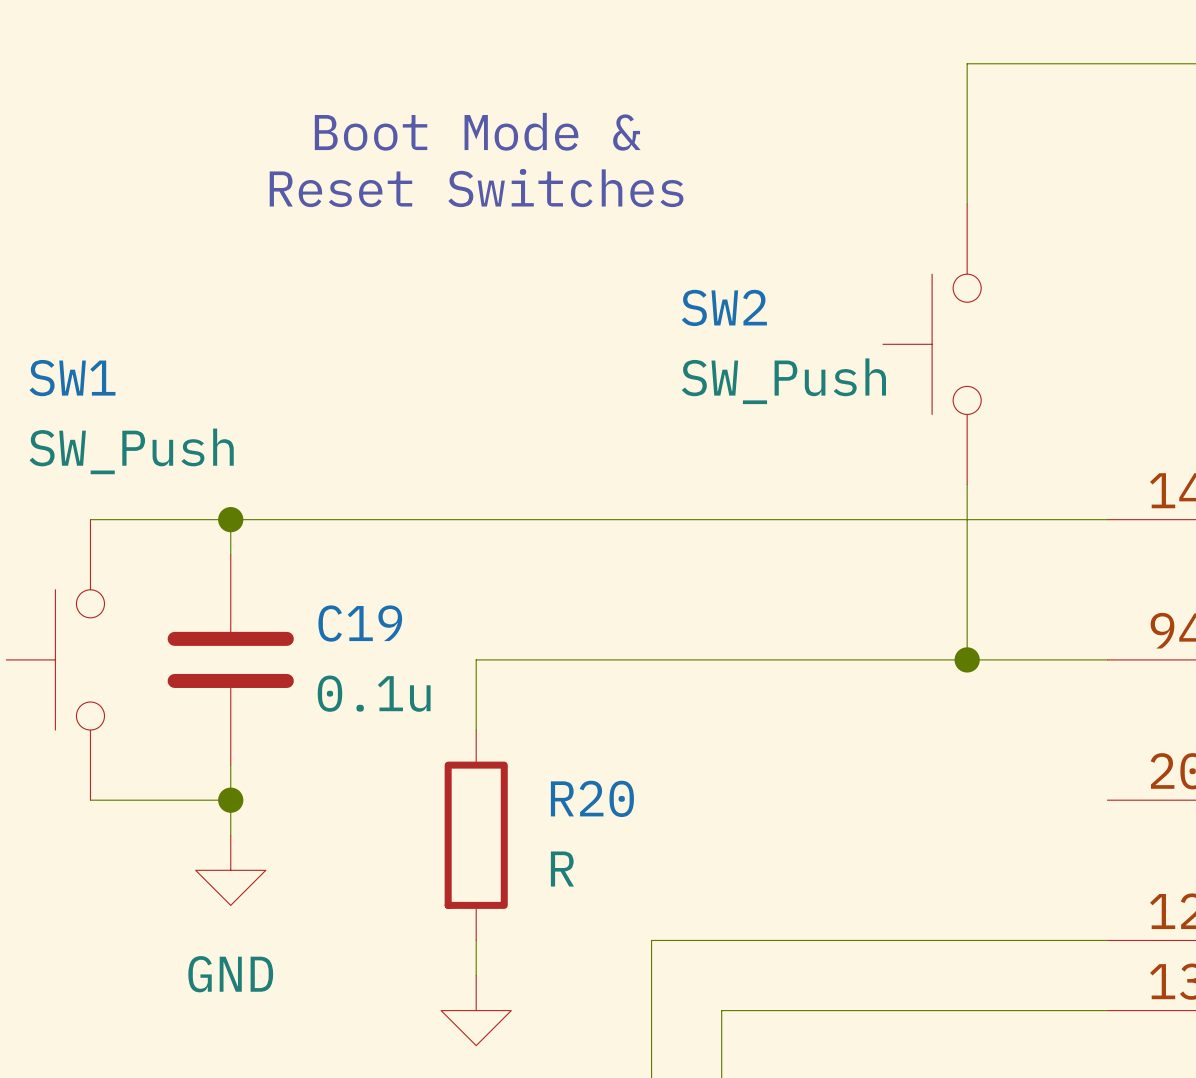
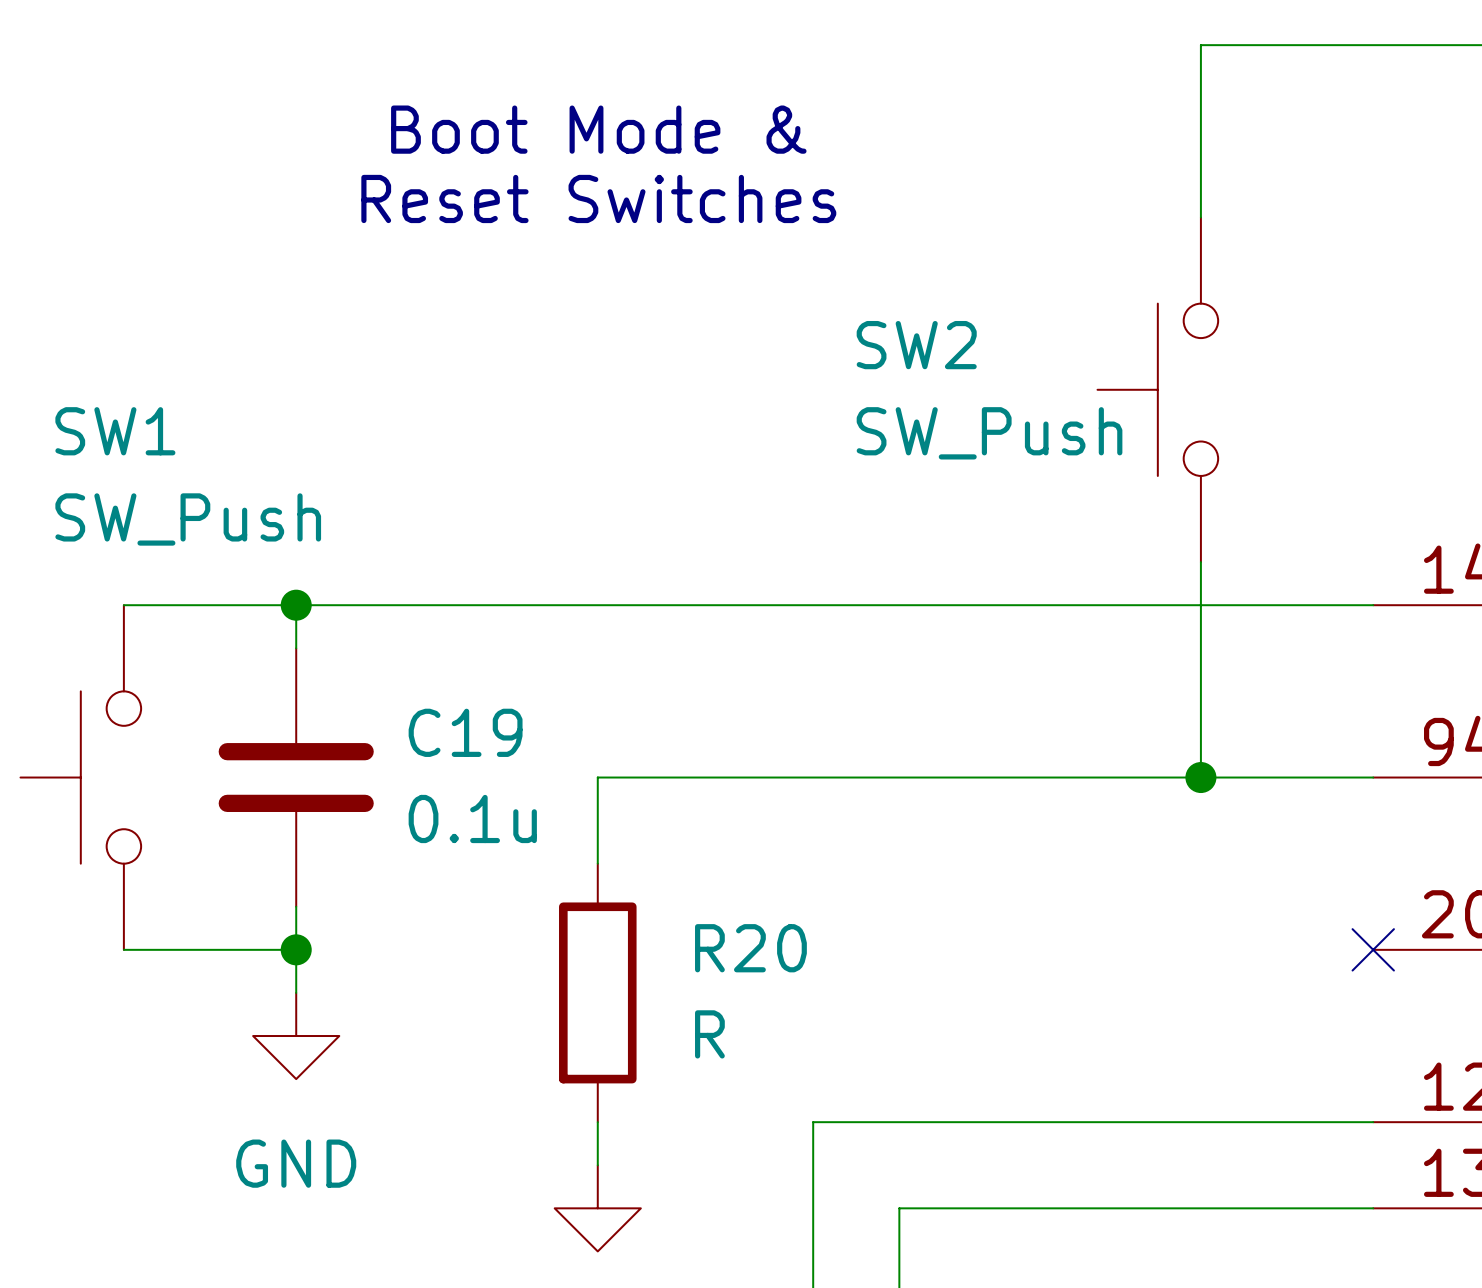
no-connect mark: none -> (1373, 949)

